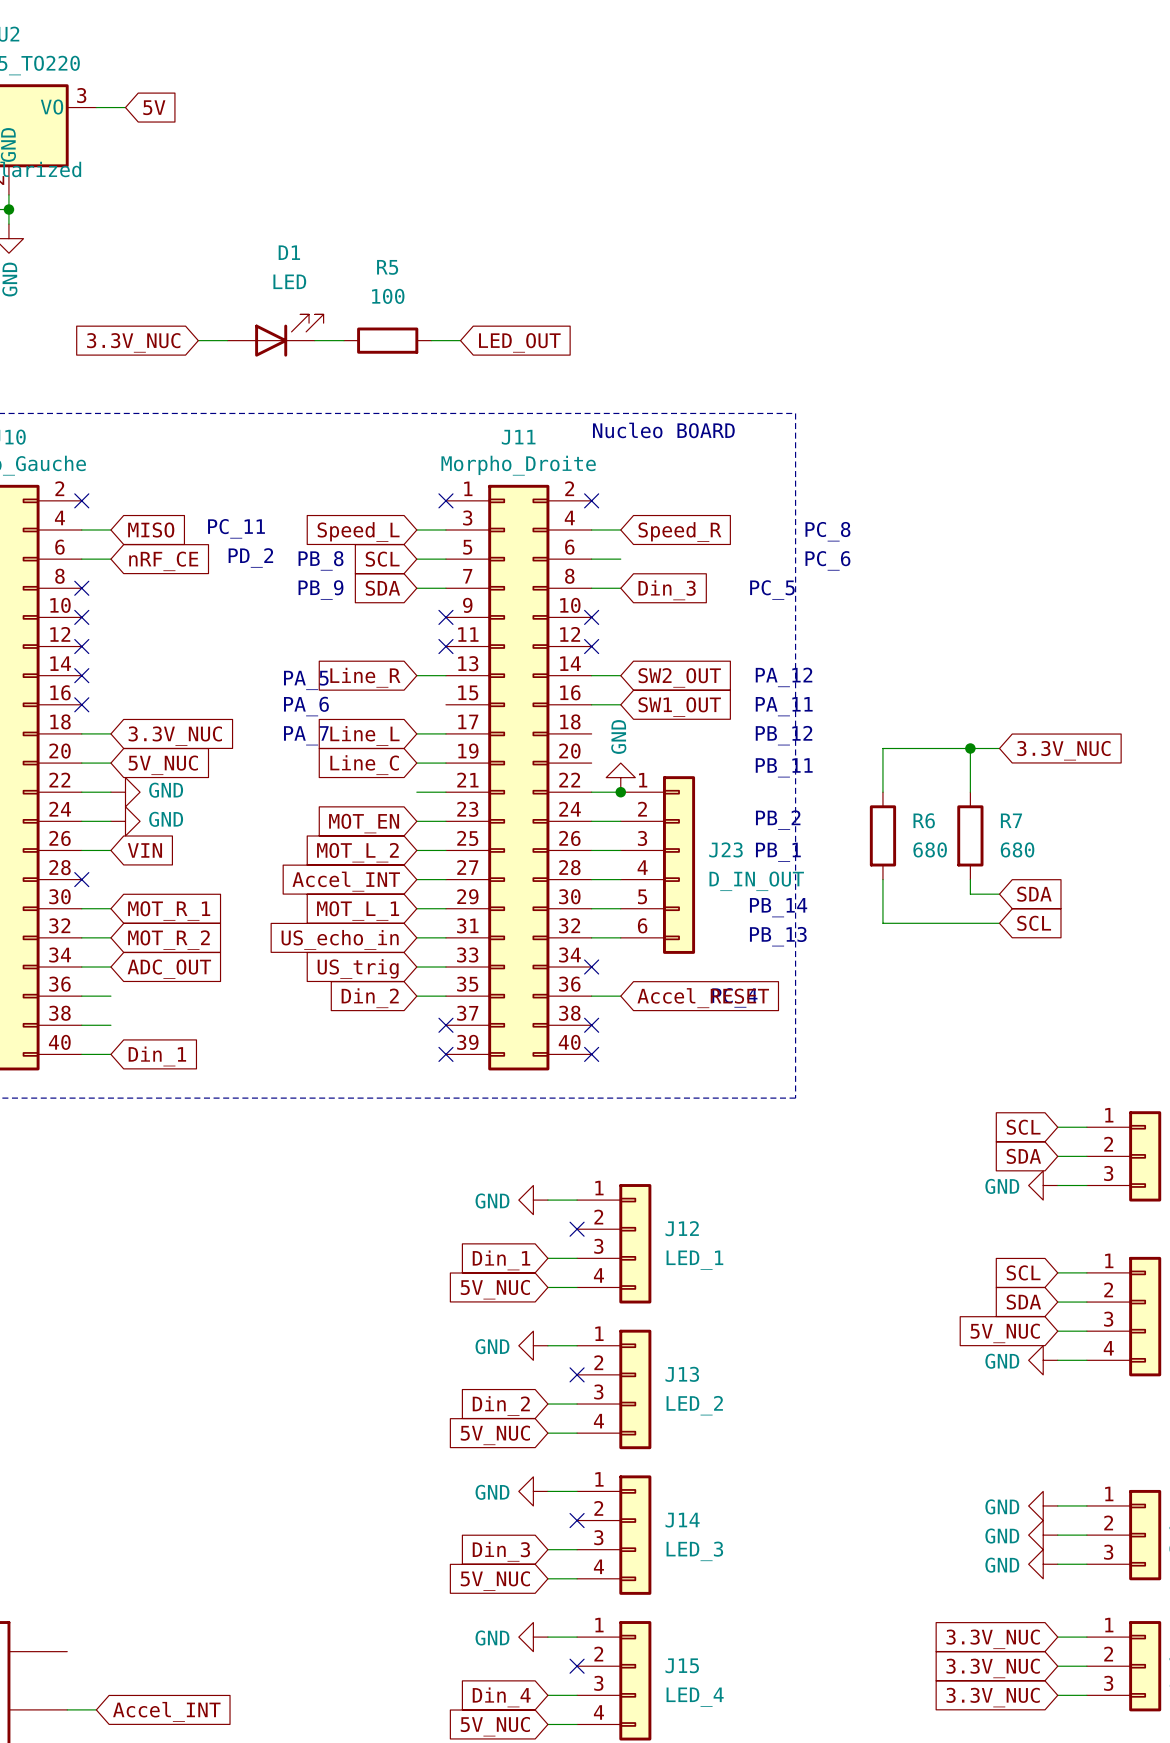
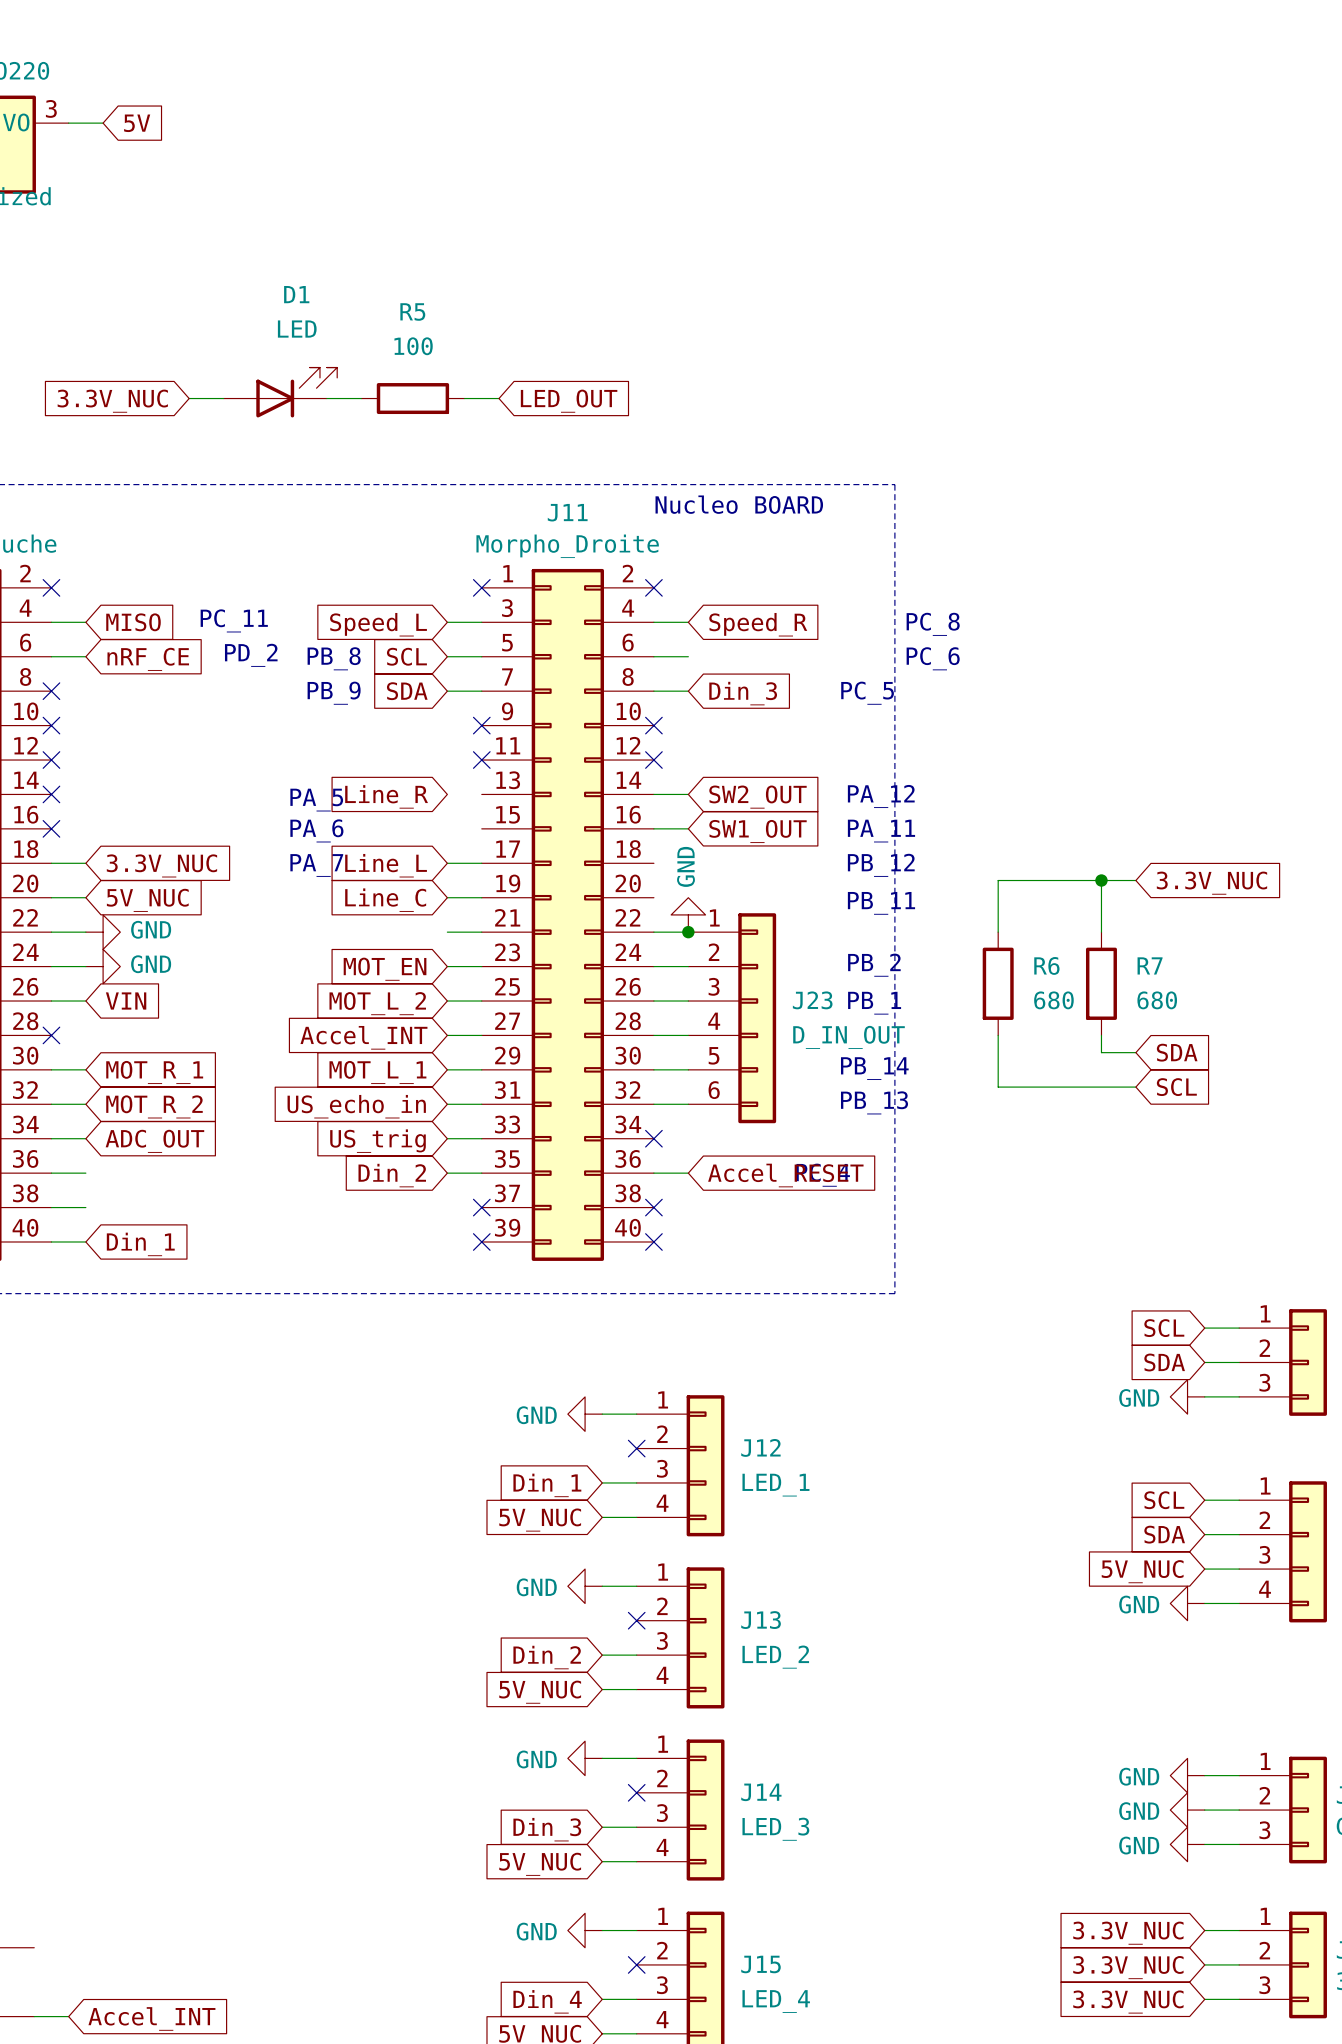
wire: (416, 675) (445, 675) -> none

